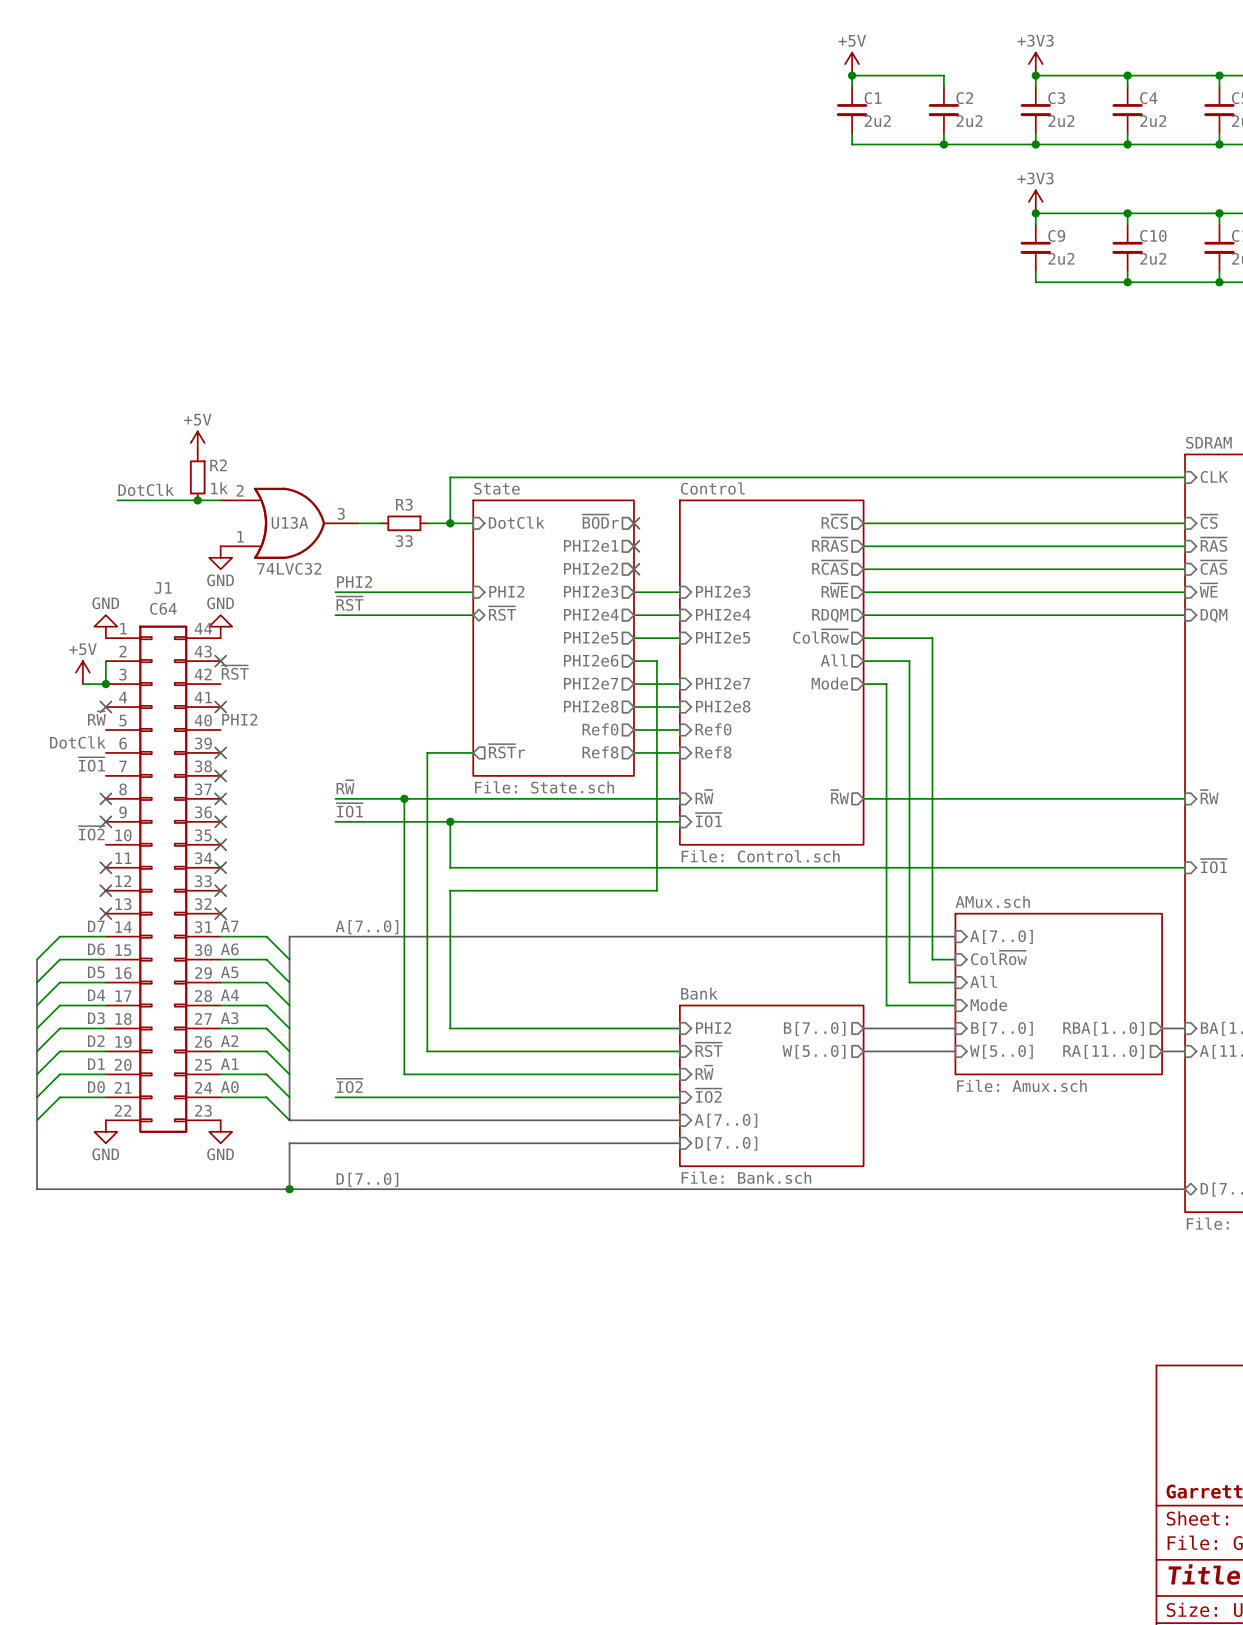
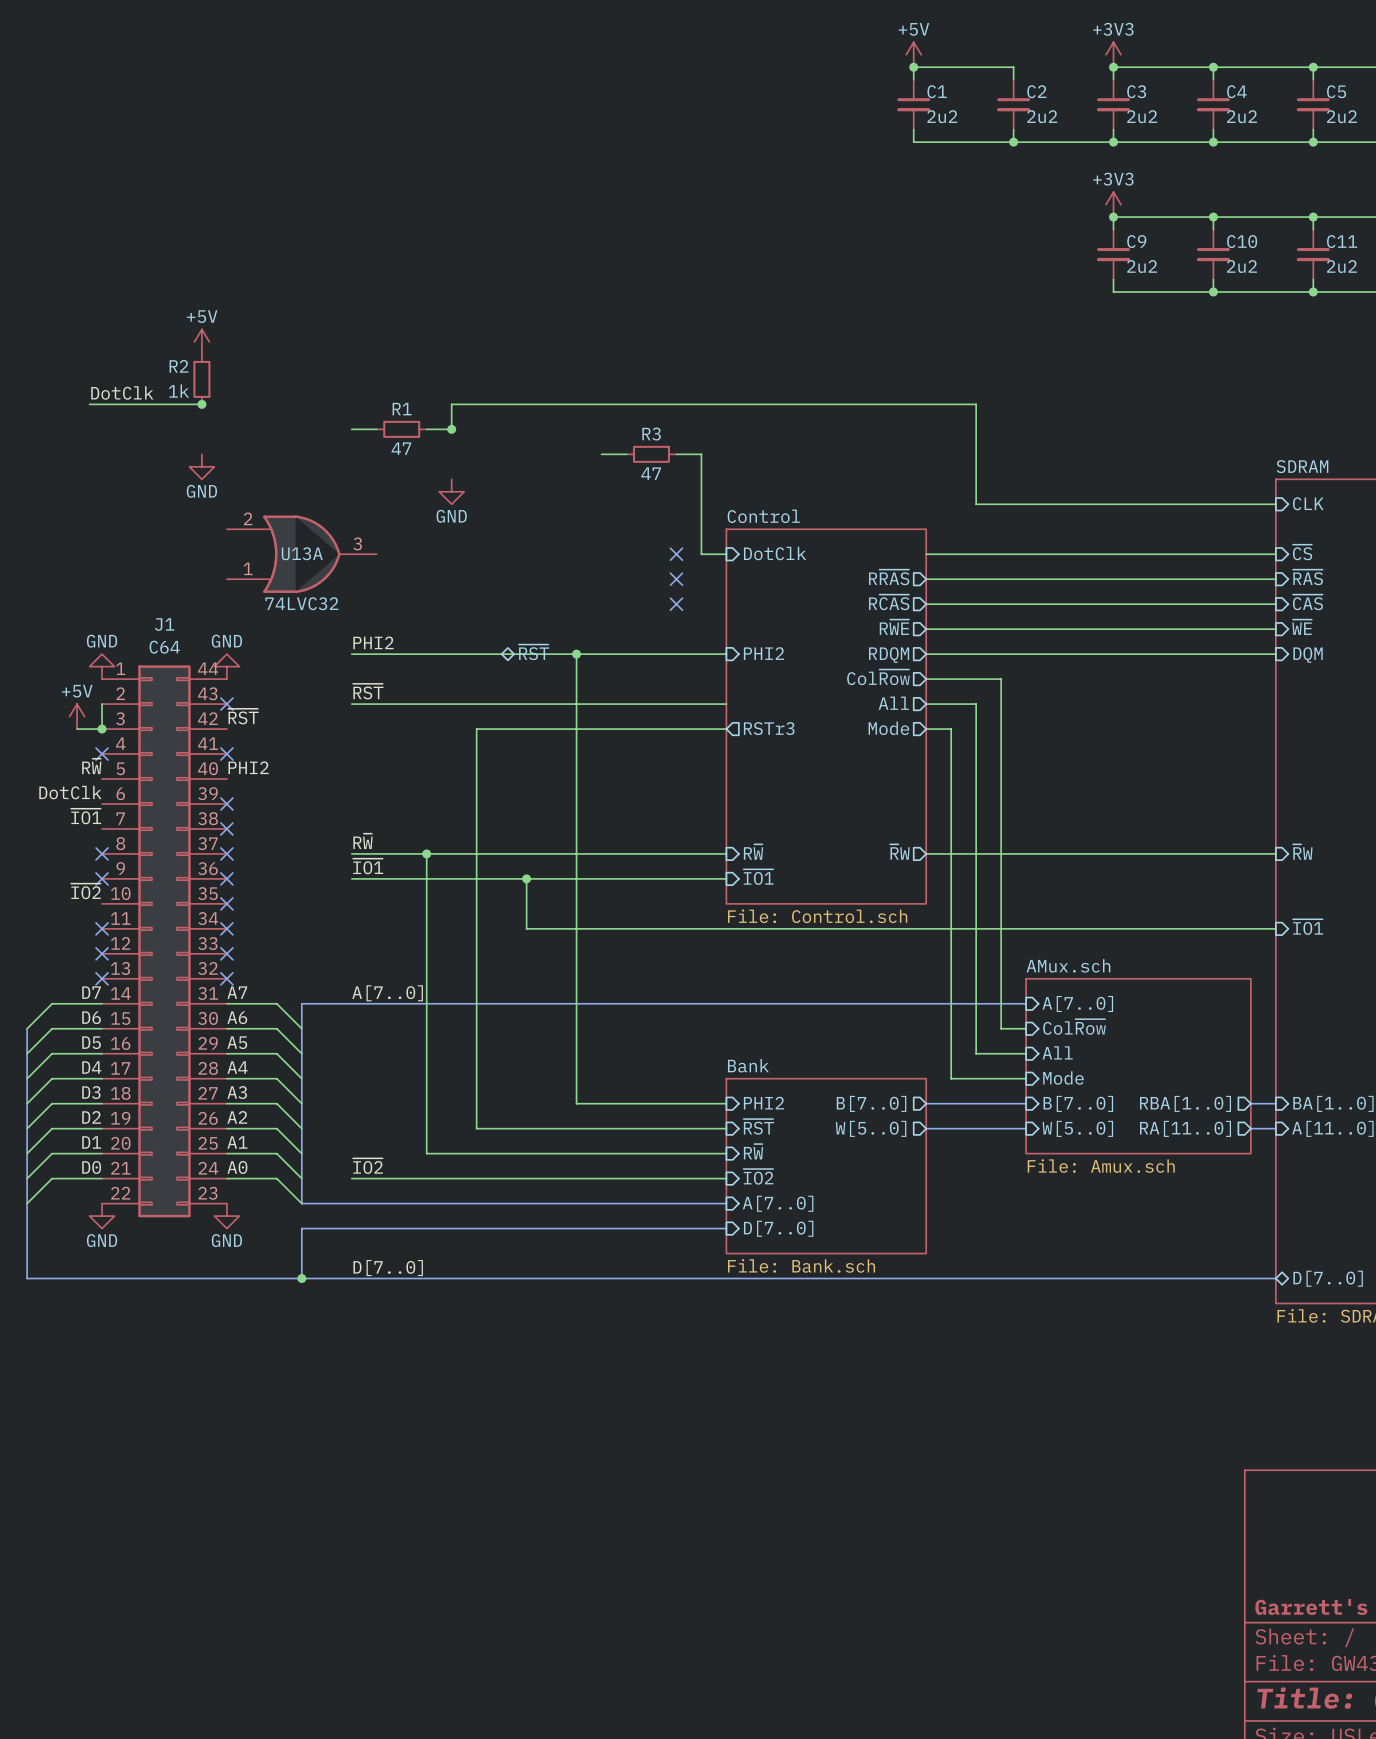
power symbol: none -> +5V (201, 341)
junction: none -> (201, 404)
R1: none -> 47 (401, 429)
junction: none -> (451, 429)
wire: none -> (601, 454) (626, 454)
wire: none -> (676, 454) (701, 454) (701, 554) (726, 554)
power symbol: +5V (197, 442) -> GND (201, 466)
R2 name position: R2 (218, 465) -> R2 (178, 366)
power symbol: none -> GND (451, 491)
R2 position: (197, 477) -> (201, 379)
wire: (909, 477) (450, 477) (450, 523) -> (976, 504) (976, 404) (451, 404) (451, 429) (426, 429)
R2 value position: 1k (219, 488) -> 1k (178, 391)
label position: DotClk (146, 489) -> DotClk (122, 392)
wire: (117, 500) (220, 500) -> (89, 404) (201, 404)
junction: (197, 500) -> none
sheet pin: ~{BOD}r (600, 521) -> none
sheet pin: R~{CS} (834, 521) -> none
sheet pin position: DotClk (516, 522) -> DotClk (775, 553)
wire: (358, 523) (381, 523) -> (351, 429) (376, 429)
R3 position: (404, 523) -> (651, 454)
wire: (427, 523) (473, 523) -> none
junction: (450, 523) -> none
R3 value: 33 (404, 541) -> 47 (651, 473)
sheet pin: PHI2e1 (591, 545) -> none
power symbol: GND (220, 557) -> none
sheet pin: PHI2e2 (591, 568) -> none
label: PHI2 (354, 581) -> none
sheet pin: PHI2 (506, 591) -> none
sheet pin: PHI2e3 (591, 591) -> none
sheet pin: PHI2e3 (723, 591) -> none
wire: (335, 592) (473, 592) -> none
wire: (633, 592) (679, 592) -> none
label: ~{RST} (350, 603) -> PHI2 (373, 642)
sheet pin: PHI2e4 (591, 614) -> none
sheet pin: PHI2e4 (723, 614) -> PHI2 (763, 653)
wire: none -> (501, 654) (676, 654)
wire: none -> (576, 654) (576, 1103)
junction: none -> (576, 654)
sheet pin: PHI2e5 (591, 637) -> none
sheet pin: PHI2e5 (723, 637) -> none
sheet State: File: State.sch (553, 638) -> none
wire: (633, 638) (679, 638) -> none
label: none -> ~{RST} (368, 691)
sheet pin: PHI2e6 (591, 660) -> none
wire: none -> (351, 704) (676, 704)
wire: (656, 661) (656, 890) (450, 890) -> (701, 704) (726, 704)
sheet pin: PHI2e7 (591, 683) -> none
sheet pin shape: input (723, 683) -> output (769, 728)
sheet pin: PHI2e7 (723, 683) -> RSTr3 (769, 728)
wire: none -> (676, 729) (476, 729) (476, 878)
sheet pin: PHI2e8 (591, 706) -> none
sheet pin: PHI2e8 (723, 706) -> none
wire: (633, 707) (679, 707) -> none
sheet pin: Ref0 (600, 729) -> none
wire: (633, 729) (679, 729) -> none
sheet pin: Ref0 (713, 729) -> none
sheet pin: ~{RST}r (507, 751) -> none
wire: (473, 752) (427, 752) (427, 1051) (450, 1051) -> none
sheet pin: Ref8 (600, 752) -> none
wire: (633, 752) (679, 752) -> none
sheet pin: Ref8 (713, 752) -> none
junction position: (450, 821) -> (526, 878)
wire: none -> (526, 878) (526, 928)
wire: (450, 867) (496, 867) -> (476, 928) (476, 953)
wire: (450, 1028) (542, 1028) -> (476, 1103) (476, 1128)

